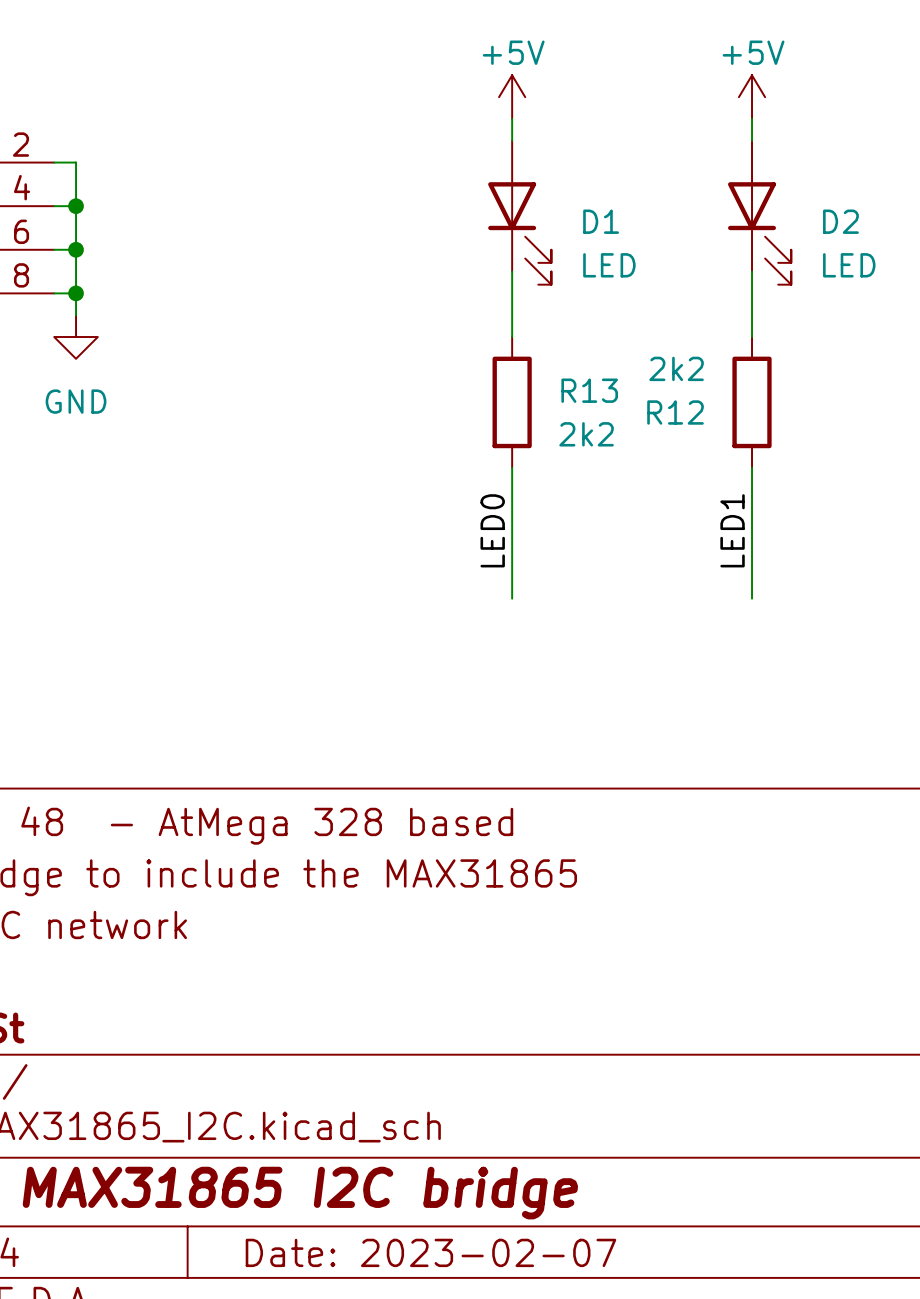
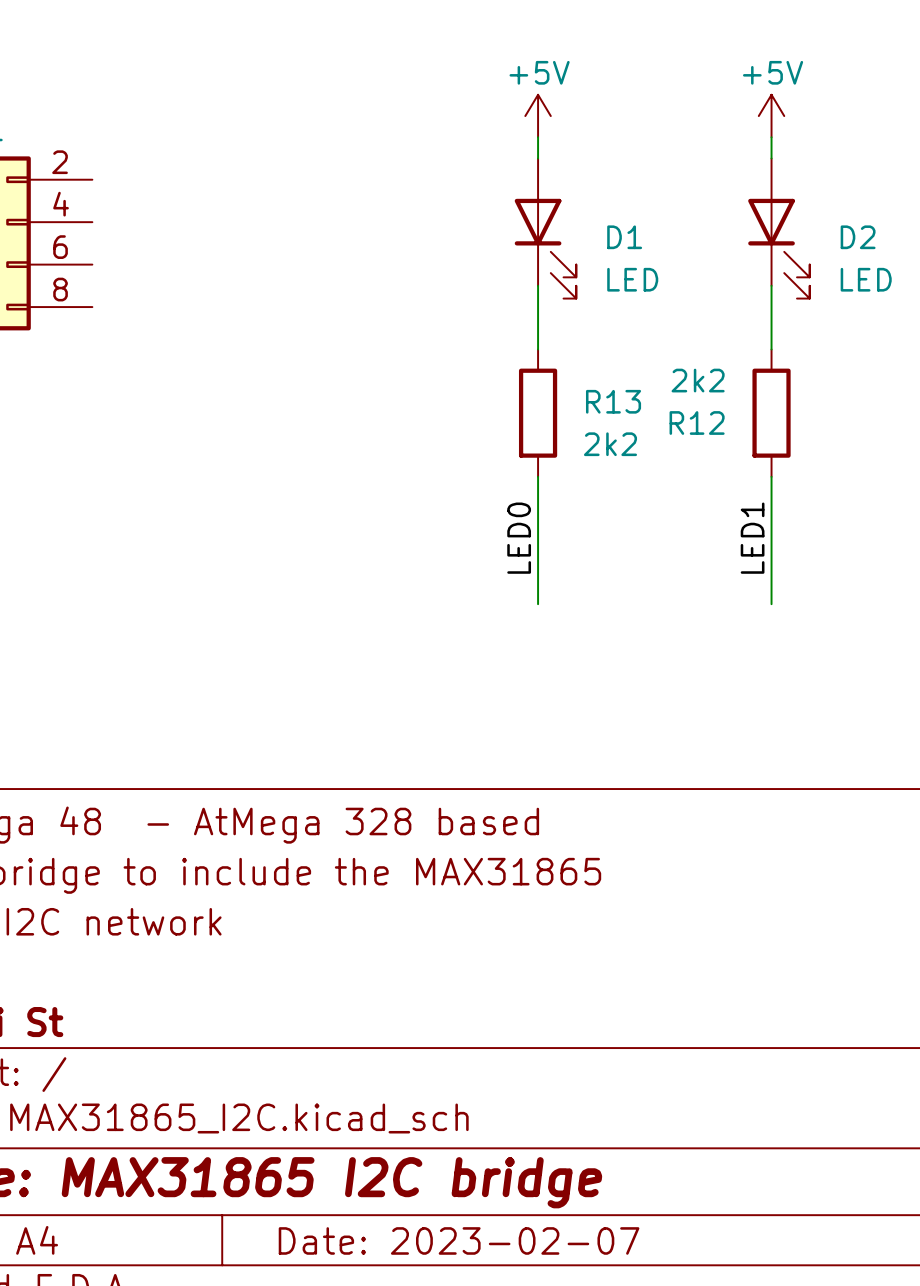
wire: (54, 162) (76, 162) (76, 315) -> none
wire: (54, 206) (76, 206) -> none
junction: (76, 206) -> none
wire: (54, 249) (76, 249) -> none
junction: (76, 249) -> none
wire: (54, 293) (76, 293) -> none
junction: (76, 293) -> none
power symbol: GND (76, 337) -> none

